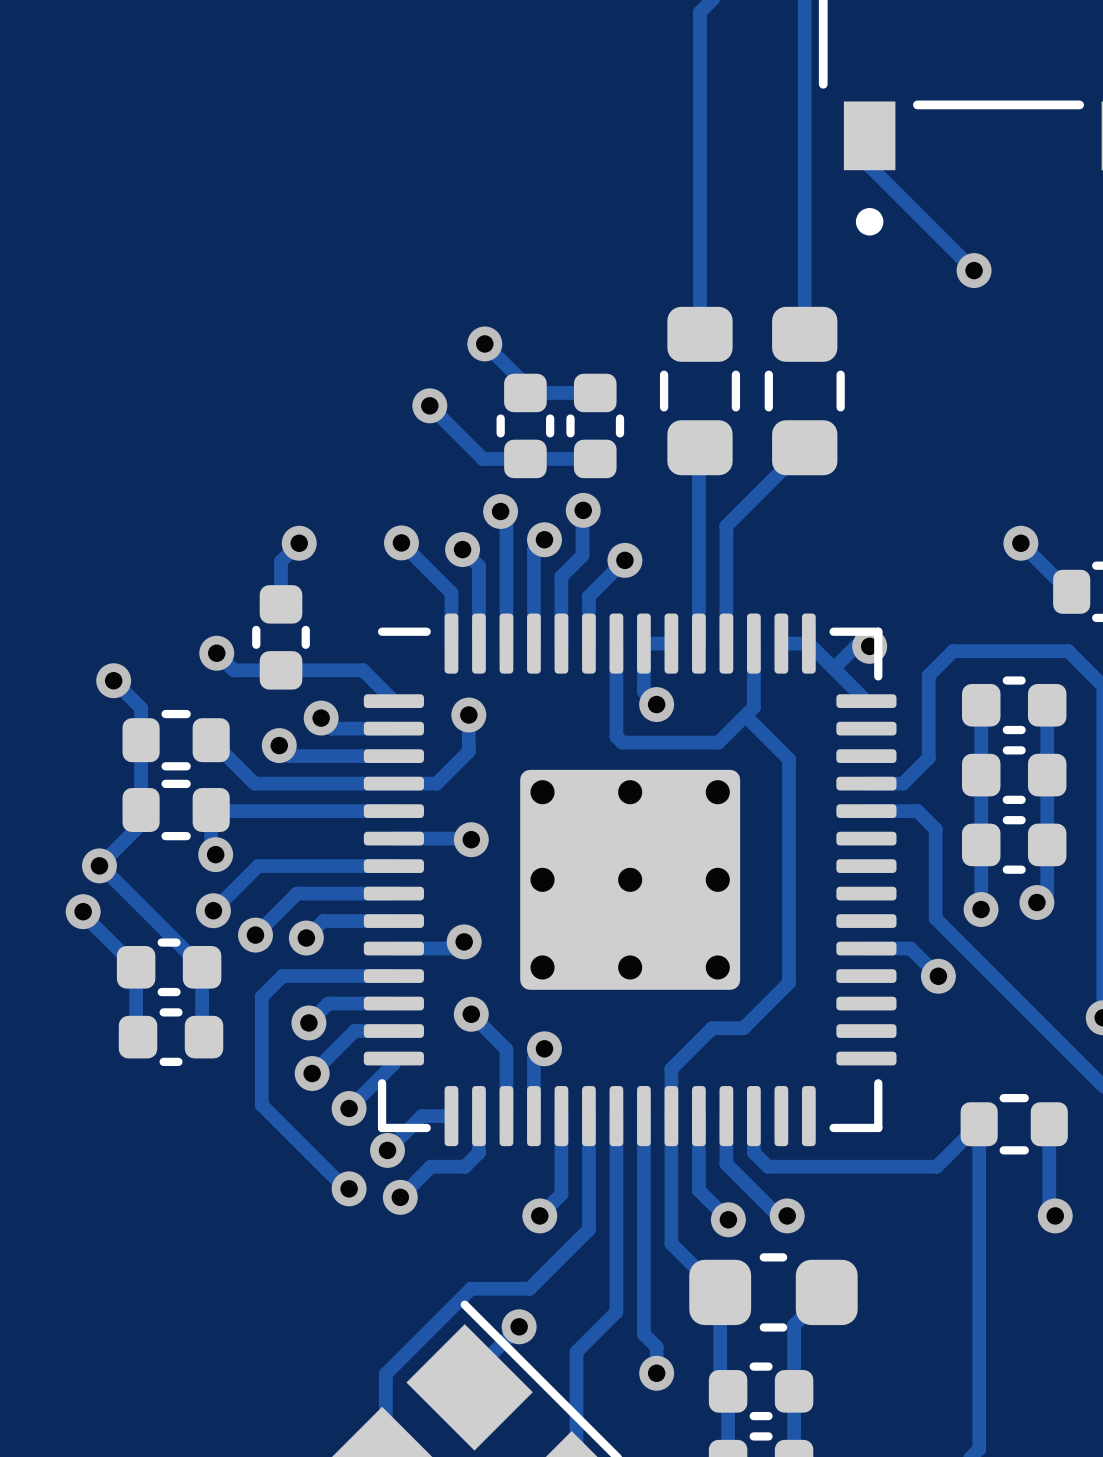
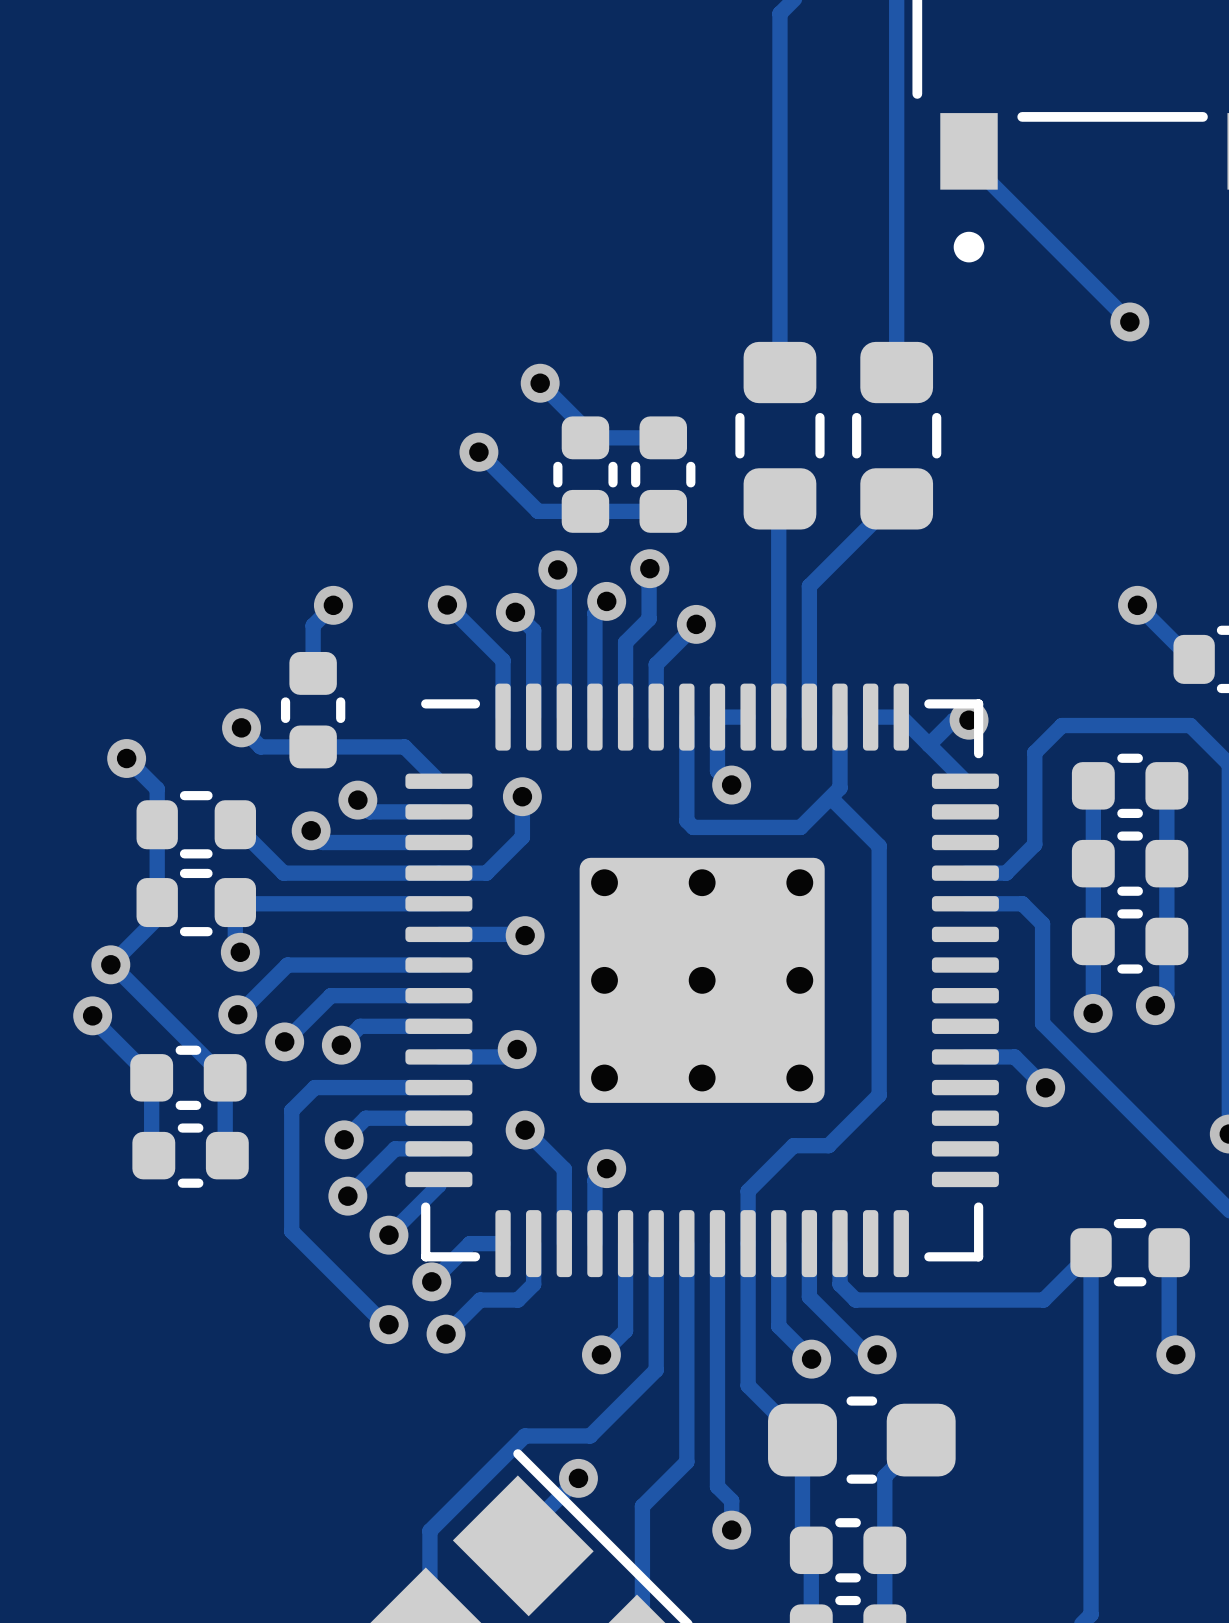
track: (869, 144) (869, 166) (974, 270) -> (969, 161) (1129, 321)
via position: (974, 270) -> (1129, 321)

